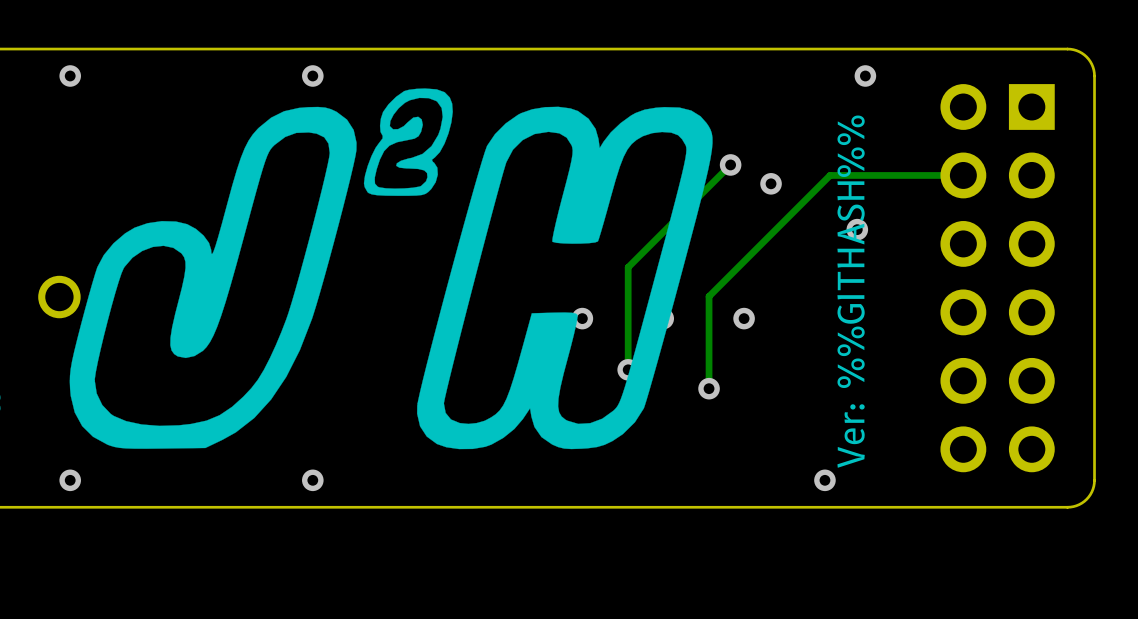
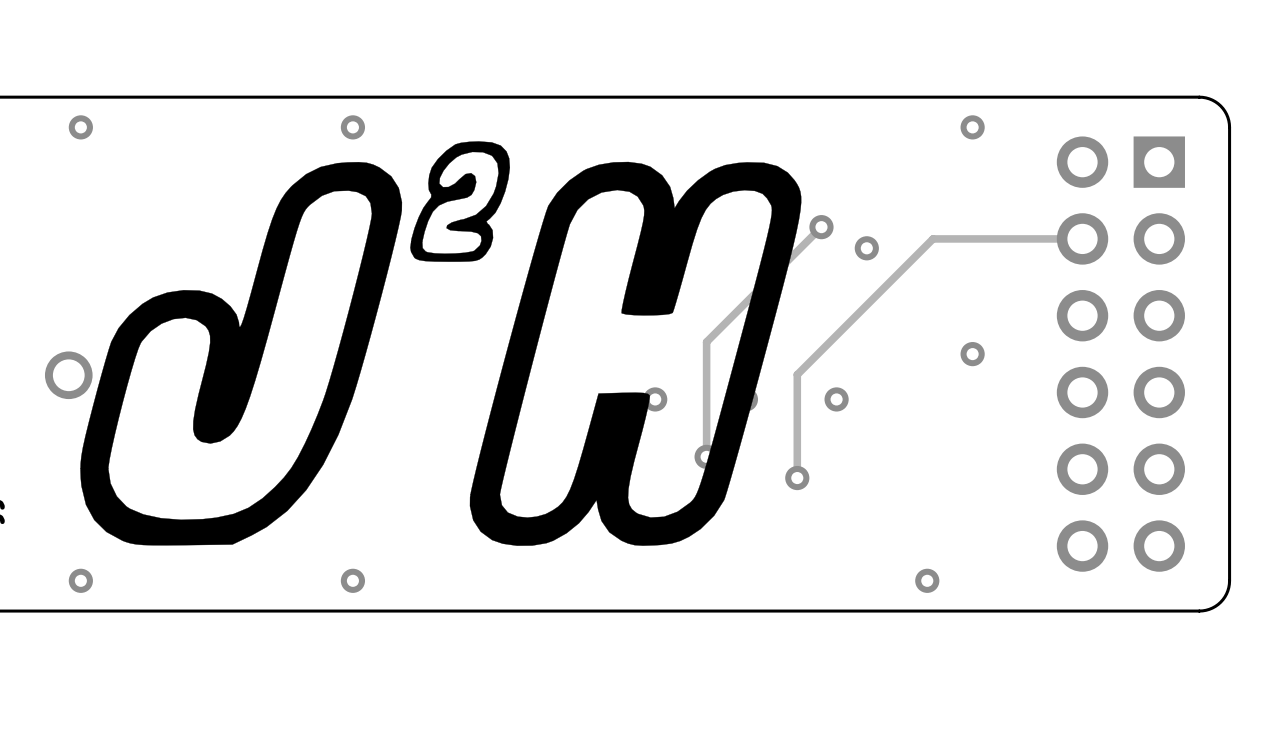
via position: (857, 229) -> (972, 354)
text: Ver: %%GITHASH%% (851, 291) -> none

